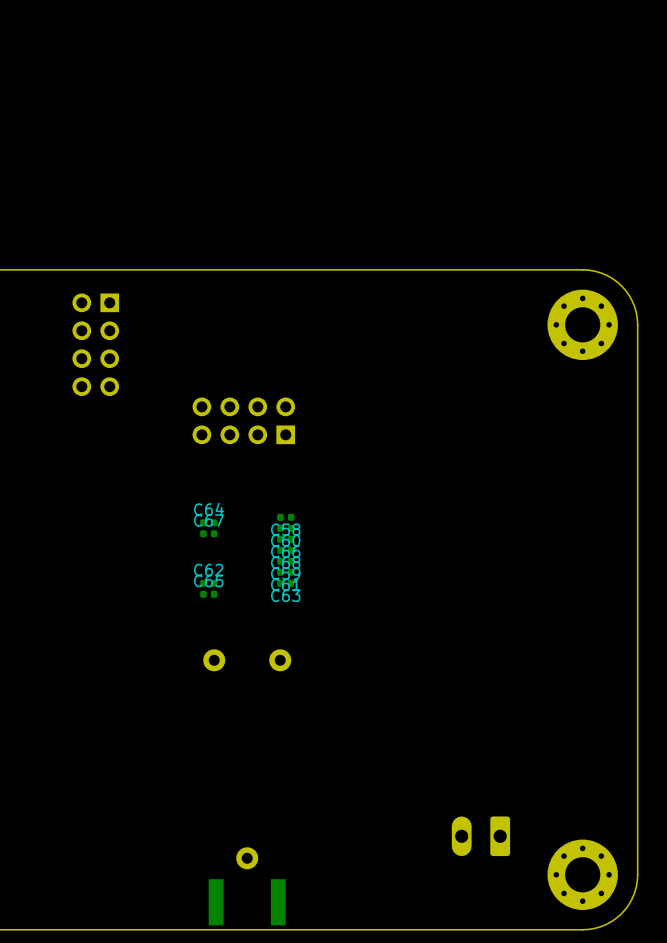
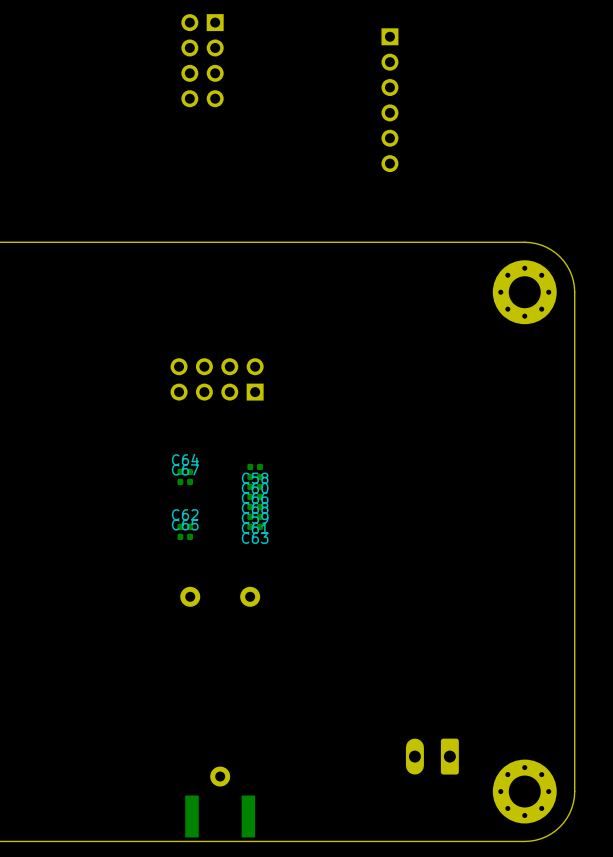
part: none -> (202, 60)
part: none -> (389, 100)
part: (95, 344) -> none

